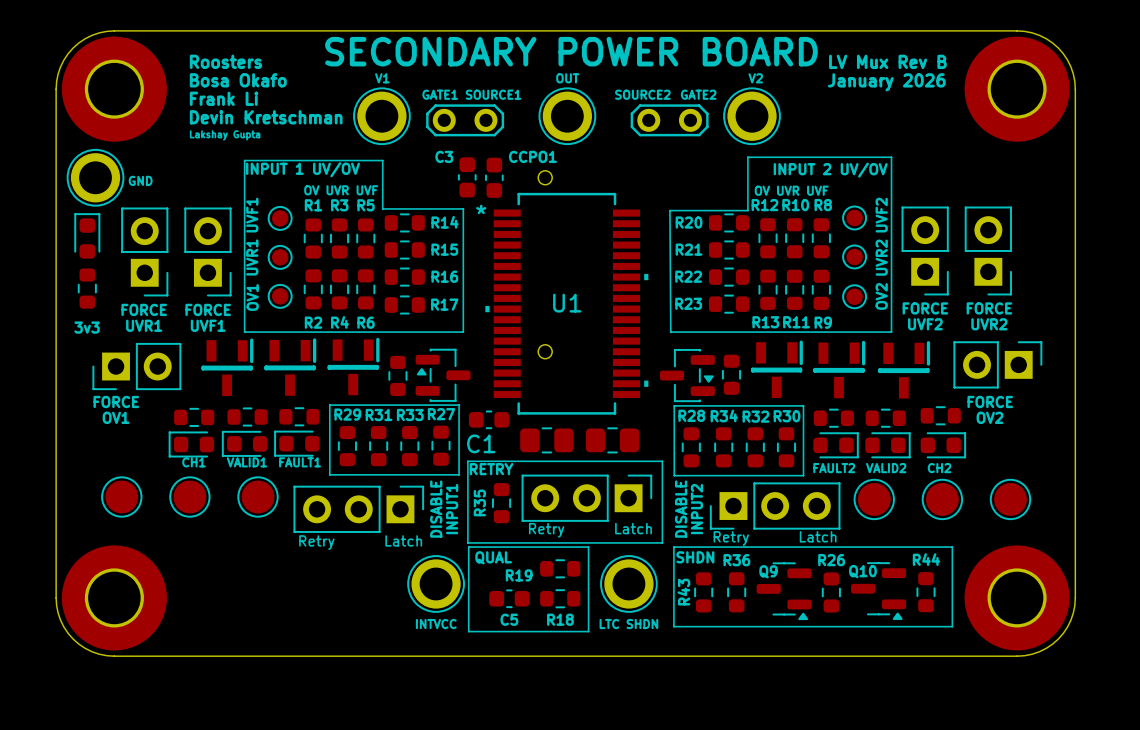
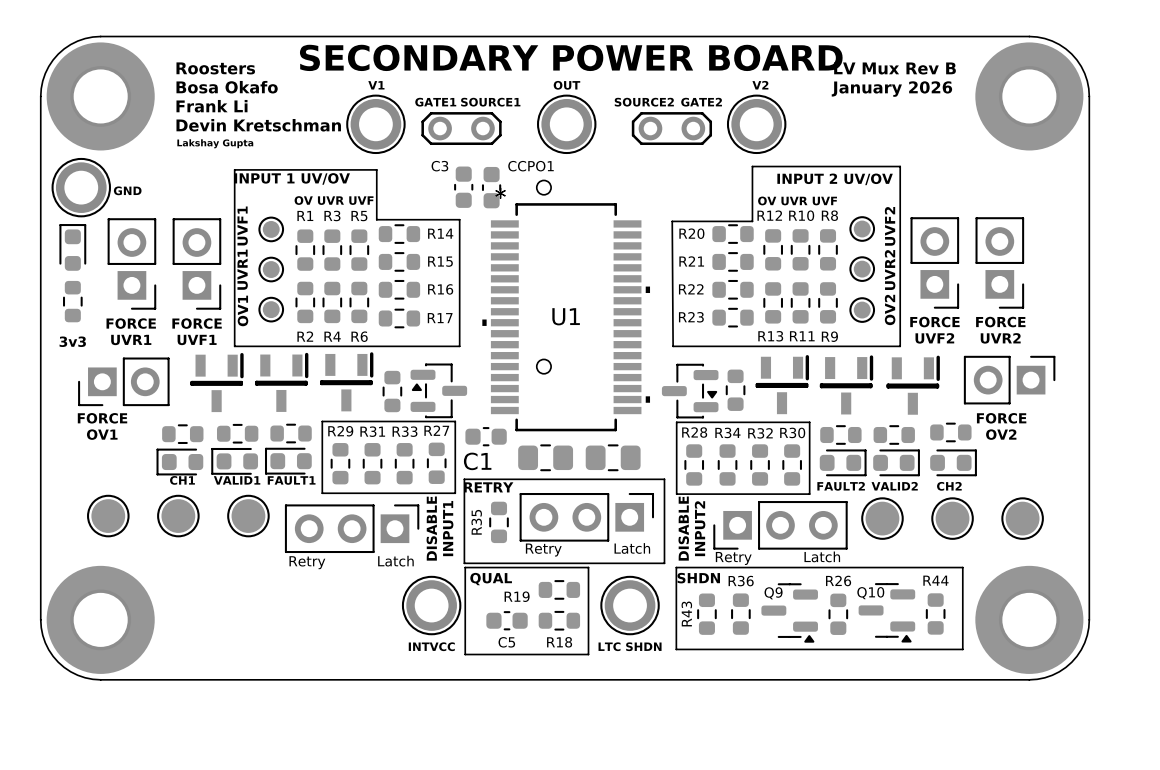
text position: * (481, 209) -> * (500, 193)

